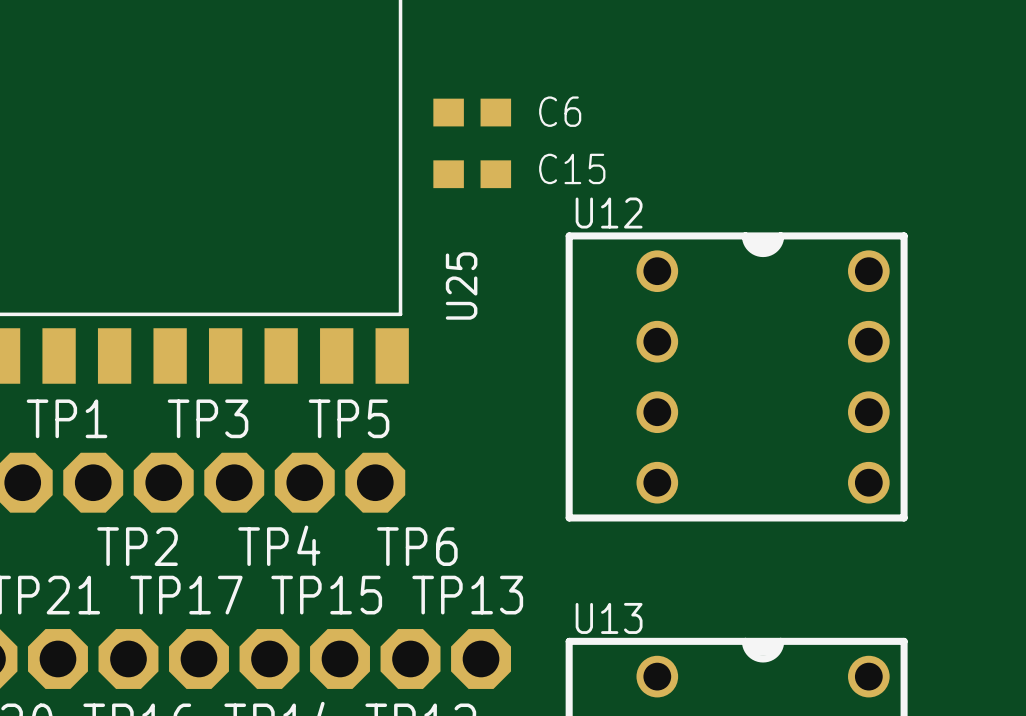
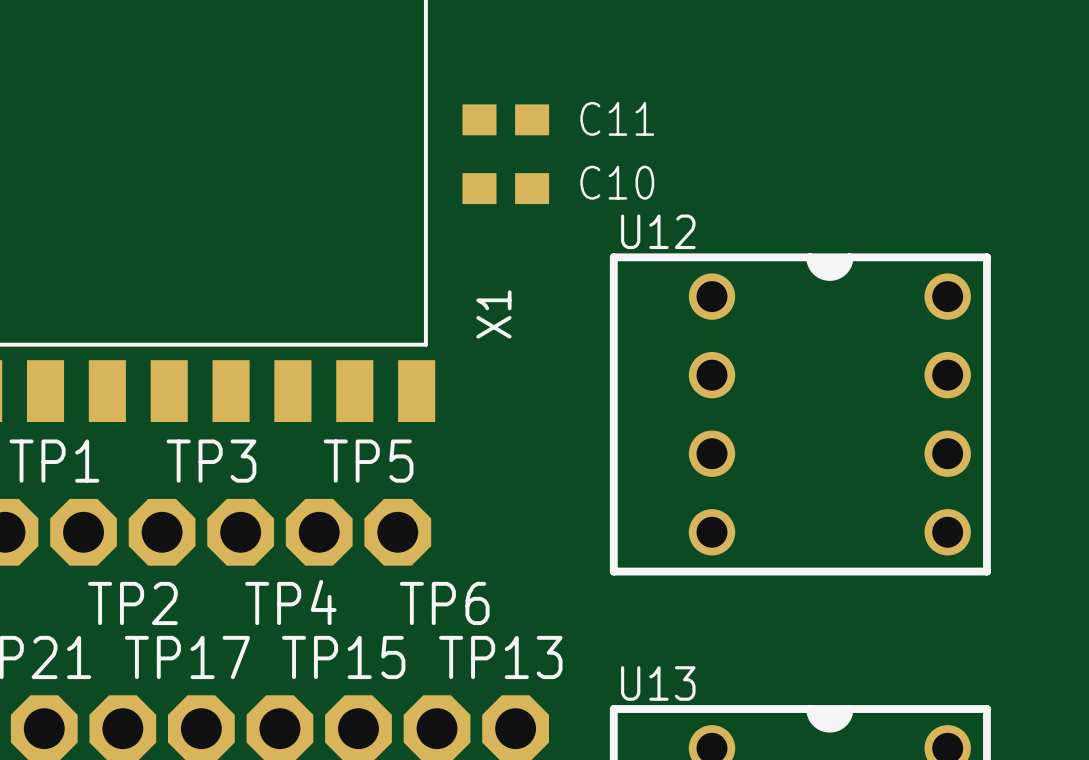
C6 name: C6 (560, 111) -> C11 (617, 118)
C15 name: C15 (572, 168) -> C10 (617, 182)
U25 name: U25 (461, 285) -> X1 (493, 314)

